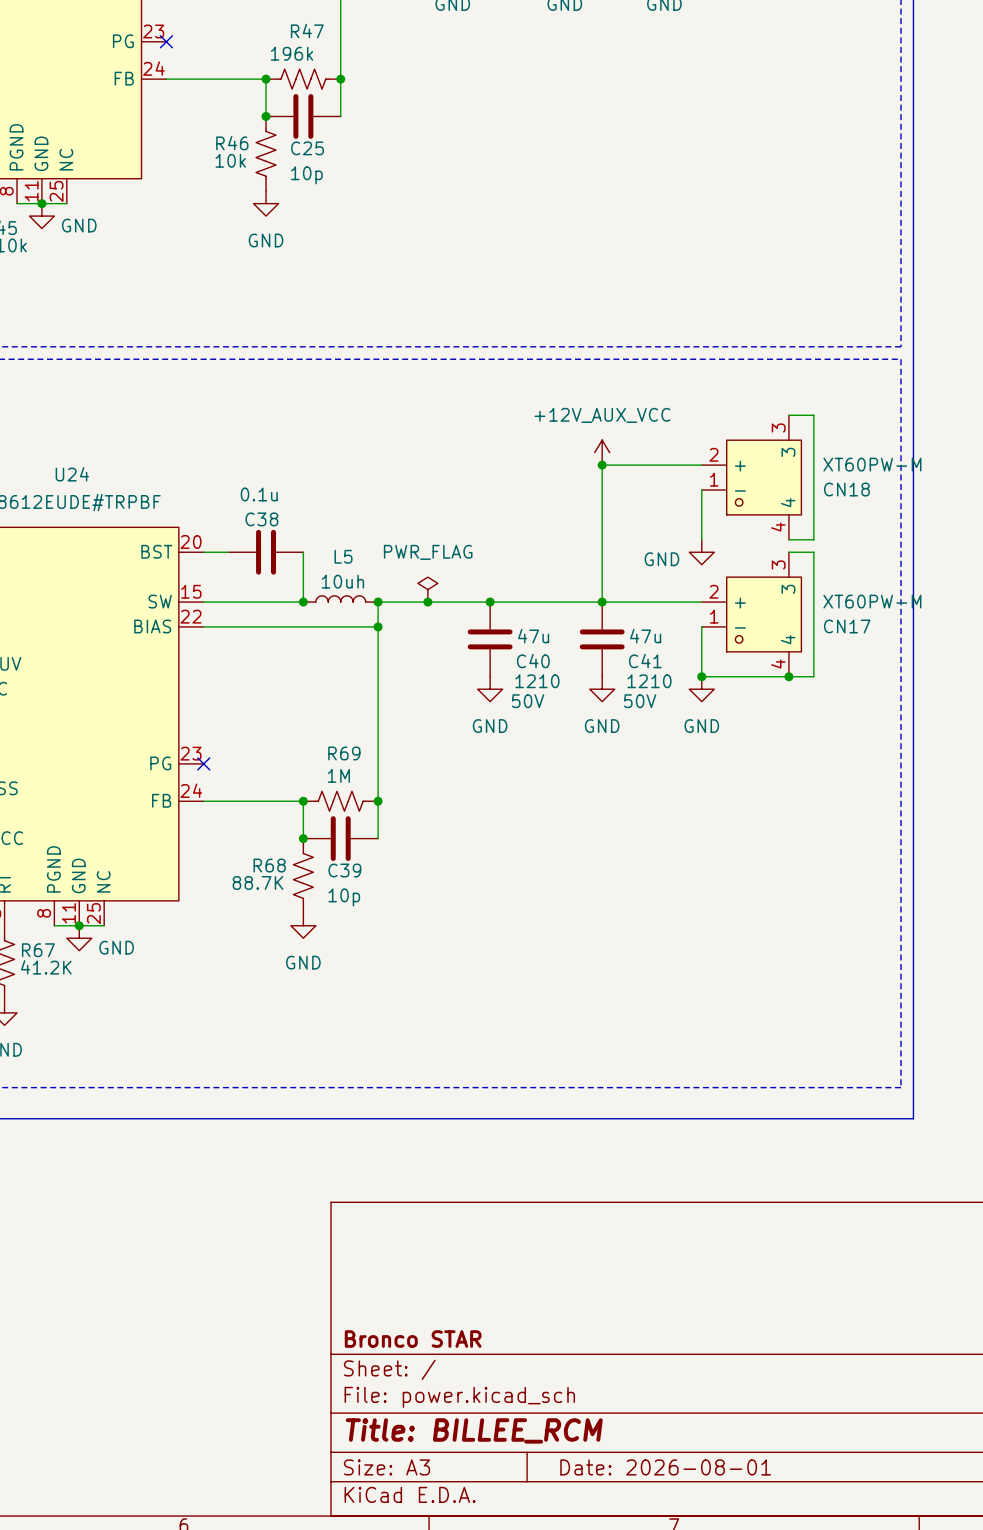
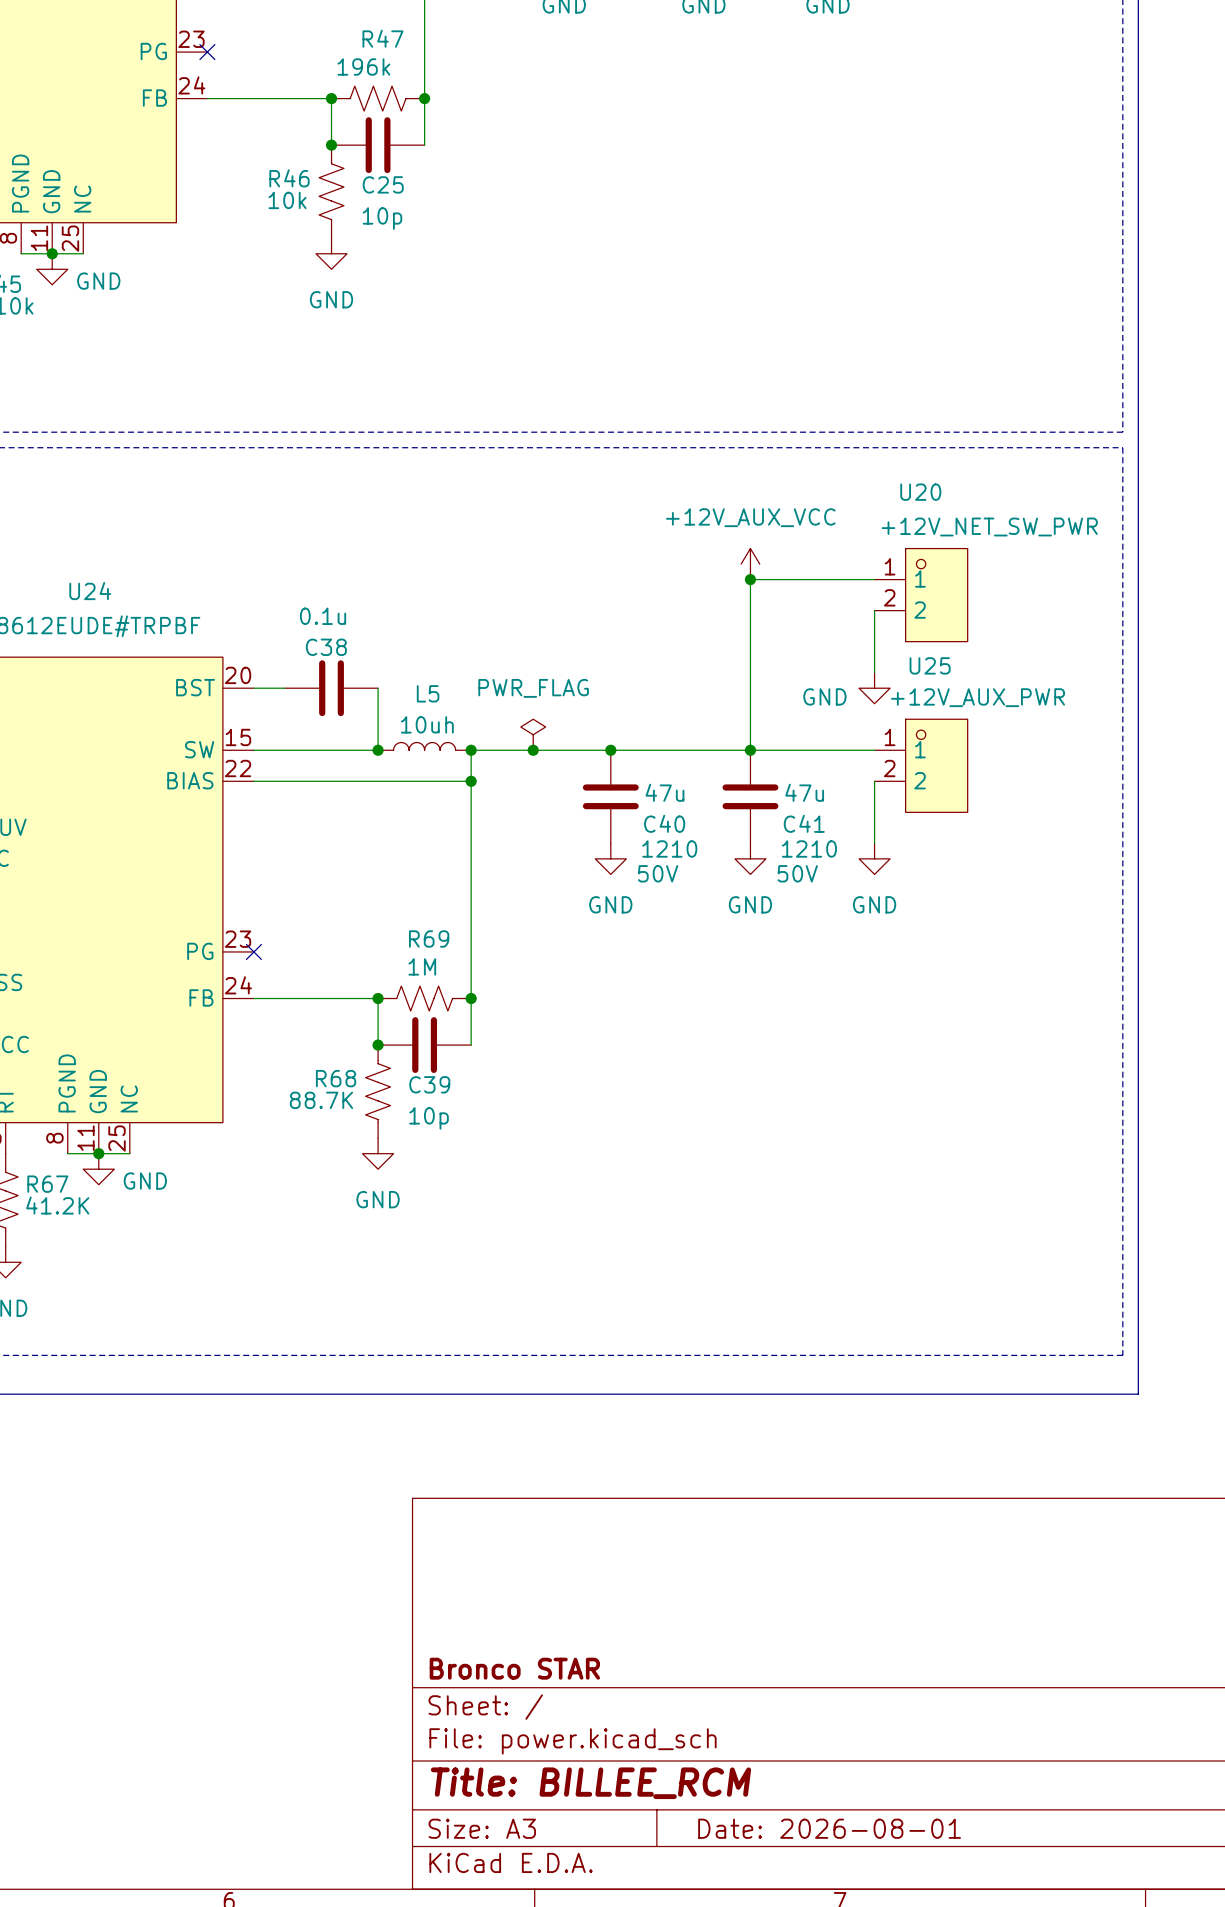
wire: (788, 415) (813, 415) (813, 539) (788, 539) -> none
U20: none -> +12V_NET_SW_PWR (921, 595)
CN18: XT60PW-M (751, 477) -> none
wire: (788, 552) (813, 552) (813, 676) (701, 676) -> none
U25: none -> +12V_AUX_PWR (921, 765)
CN17: XT60PW-M (751, 614) -> none
junction: (701, 676) -> none
junction: (788, 676) -> none

